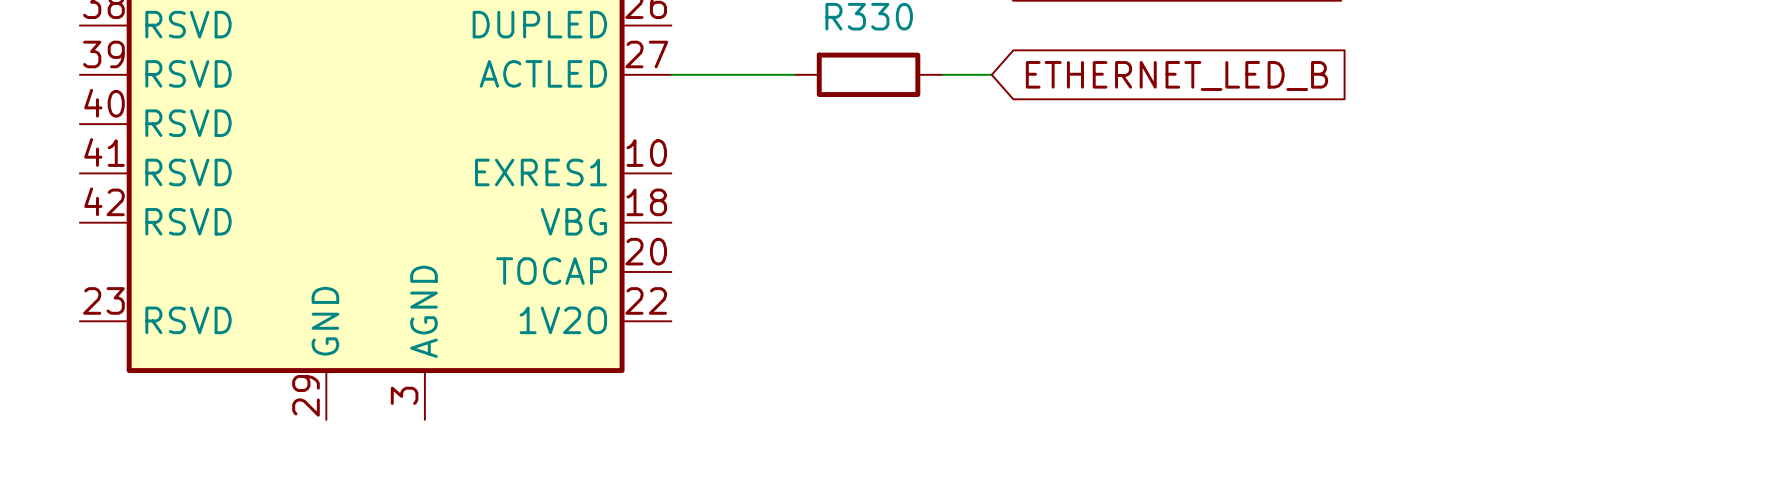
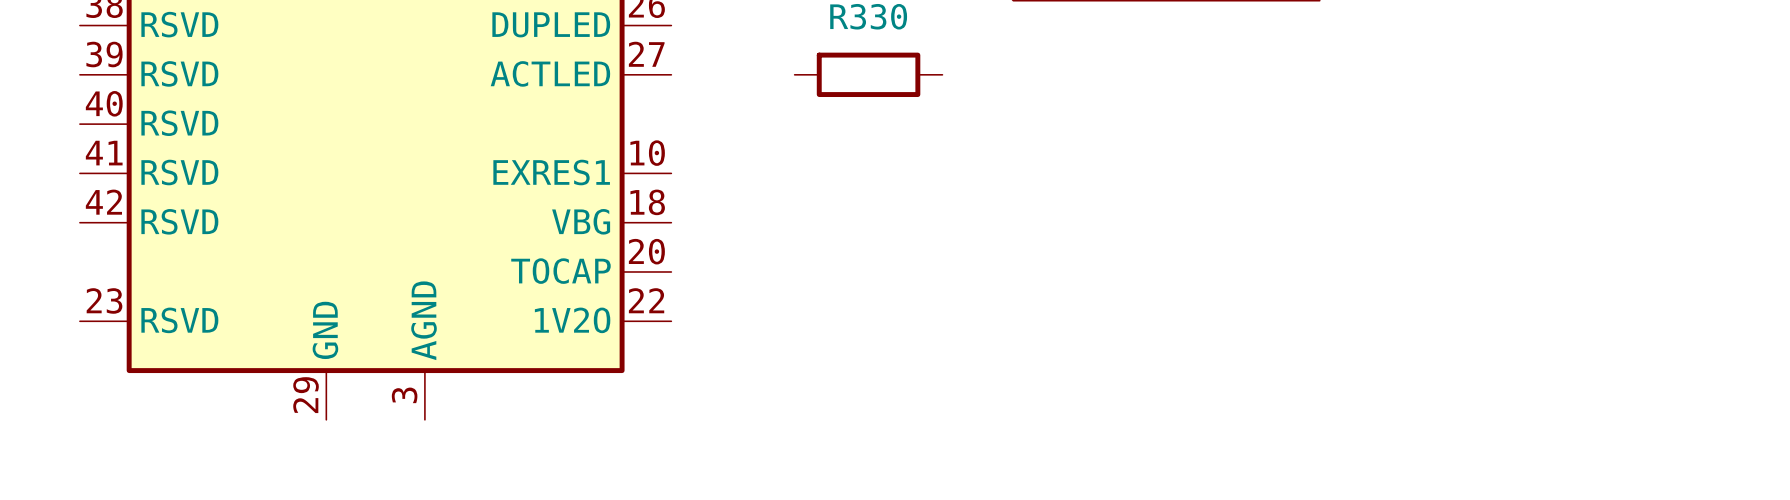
wire: (671, 74) (794, 74) -> none
wire: (942, 74) (991, 74) -> none
global label: ETHERNET_LED_B (1176, 75) -> none

